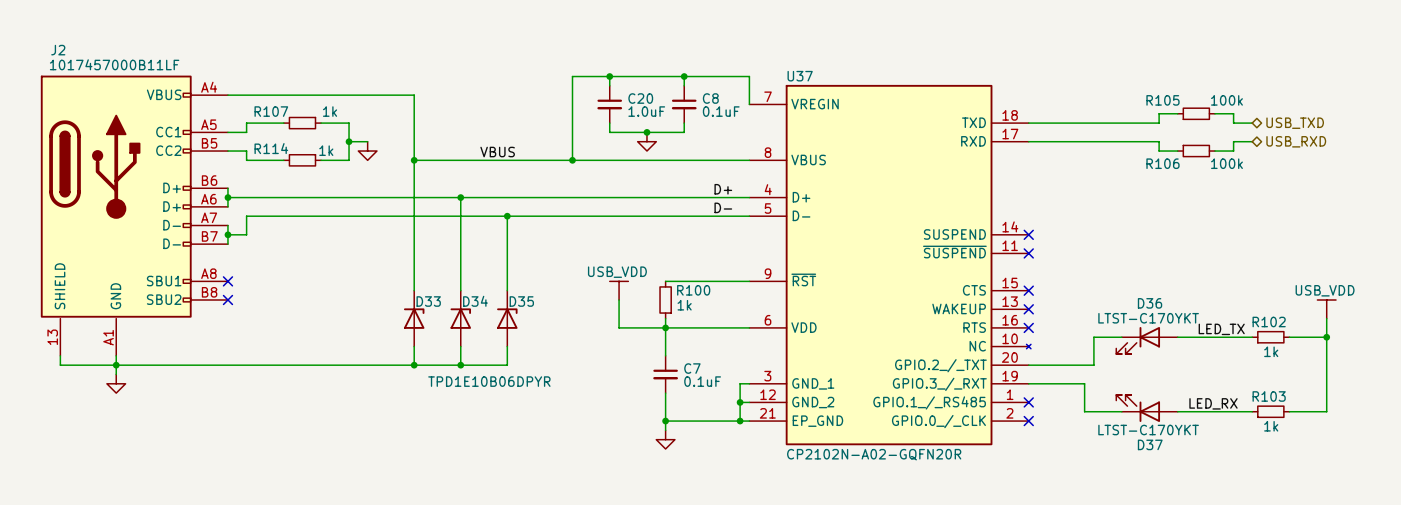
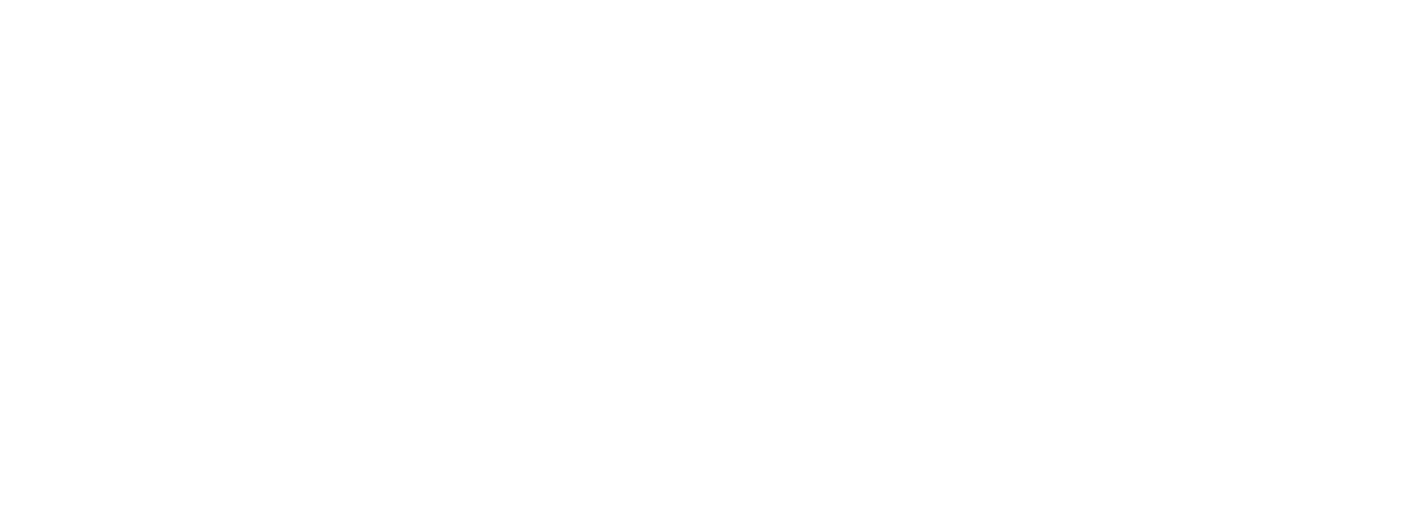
wire: (609, 76) (609, 85) -> none
junction: (609, 76) -> none
wire: (684, 76) (684, 85) -> none
junction: (684, 76) -> none
wire: (227, 95) (414, 95) (414, 290) -> none
C20: 1.0uF (609, 104) -> none
C8: 0.1uF (684, 104) -> none
wire: (749, 104) (749, 76) (572, 76) (572, 160) -> none
wire: (1177, 113) (1159, 113) (1159, 123) (1028, 123) -> none
R105: 100k (1196, 113) -> none
wire: (1214, 113) (1233, 113) (1233, 123) (1252, 123) -> none
wire: (283, 123) (246, 123) (246, 132) (227, 132) -> none
R107: 1k (302, 123) -> none
wire: (321, 123) (349, 123) (349, 160) (321, 160) -> none
wire: (609, 123) (609, 132) (684, 132) (684, 123) -> none
hierarchical label: USB_TXD (1295, 123) -> none
junction: (646, 132) -> none
wire: (349, 141) (367, 141) -> none
junction: (349, 141) -> none
power symbol: (646, 141) -> none
wire: (1028, 141) (1159, 141) (1159, 151) (1177, 151) -> none
wire: (1252, 141) (1233, 141) (1233, 151) (1214, 151) -> none
hierarchical label: USB_RXD (1296, 141) -> none
wire: (227, 151) (246, 151) (246, 160) (283, 160) -> none
power symbol: (367, 151) -> none
R106: 100k (1196, 151) -> none
label: VBUS (497, 152) -> none
R114: 1k (302, 160) -> none
wire: (414, 160) (749, 160) -> none
junction: (414, 160) -> none
junction: (572, 160) -> none
wire: (227, 188) (227, 206) -> none
label: D+ (723, 189) -> none
wire: (227, 197) (749, 197) -> none
junction: (227, 197) -> none
wire: (460, 197) (460, 290) -> none
junction: (460, 197) -> none
label: D- (723, 207) -> none
J2: 1017457000B11LF (134, 215) -> none
wire: (507, 216) (507, 290) -> none
junction: (507, 216) -> none
wire: (749, 216) (246, 216) (246, 234) (227, 234) -> none
wire: (227, 225) (227, 244) -> none
junction: (227, 234) -> none
no-connect mark: (1028, 234) -> none
no-connect mark: (1028, 253) -> none
U37: CP2102N-A02-GQFN20R (890, 265) -> none
no-connect mark: (227, 281) -> none
wire: (665, 281) (749, 281) -> none
power symbol: USB_VDD (619, 290) -> none
no-connect mark: (1028, 290) -> none
no-connect mark: (227, 300) -> none
wire: (619, 300) (619, 327) (749, 327) -> none
R100: 1k (665, 300) -> none
no-connect mark: (1028, 309) -> none
power symbol: USB_VDD (1326, 309) -> none
D33: TPD1E10B06DPYR (414, 318) -> none
D34: (460, 318) -> none
D35: (507, 318) -> none
wire: (665, 318) (665, 355) -> none
wire: (1326, 318) (1326, 411) (1289, 411) -> none
junction: (665, 327) -> none
no-connect mark: (1028, 327) -> none
label: LED_TX (1221, 329) -> none
wire: (1121, 337) (1093, 337) (1093, 365) (1028, 365) -> none
wire: (1177, 337) (1252, 337) -> none
R102: 1k (1270, 337) -> none
wire: (1289, 337) (1326, 337) -> none
junction: (1326, 337) -> none
D36: LTST-C170YKT (1147, 340) -> none
wire: (414, 346) (414, 365) -> none
wire: (460, 346) (460, 365) -> none
wire: (507, 346) (507, 365) (60, 365) (60, 355) -> none
wire: (116, 355) (116, 374) -> none
junction: (116, 365) -> none
junction: (414, 365) -> none
junction: (460, 365) -> none
C7: 0.1uF (665, 374) -> none
power symbol: (116, 383) -> none
wire: (749, 383) (740, 383) (740, 421) -> none
wire: (1028, 383) (1084, 383) (1084, 411) (1121, 411) -> none
wire: (665, 393) (665, 430) -> none
wire: (740, 402) (749, 402) -> none
junction: (740, 402) -> none
no-connect mark: (1028, 402) -> none
label: LED_RX (1213, 403) -> none
D37: LTST-C170YKT (1147, 408) -> none
wire: (1177, 411) (1252, 411) -> none
R103: 1k (1270, 411) -> none
wire: (665, 421) (749, 421) -> none
junction: (665, 421) -> none
junction: (740, 421) -> none
no-connect mark: (1028, 421) -> none
power symbol: (665, 439) -> none

